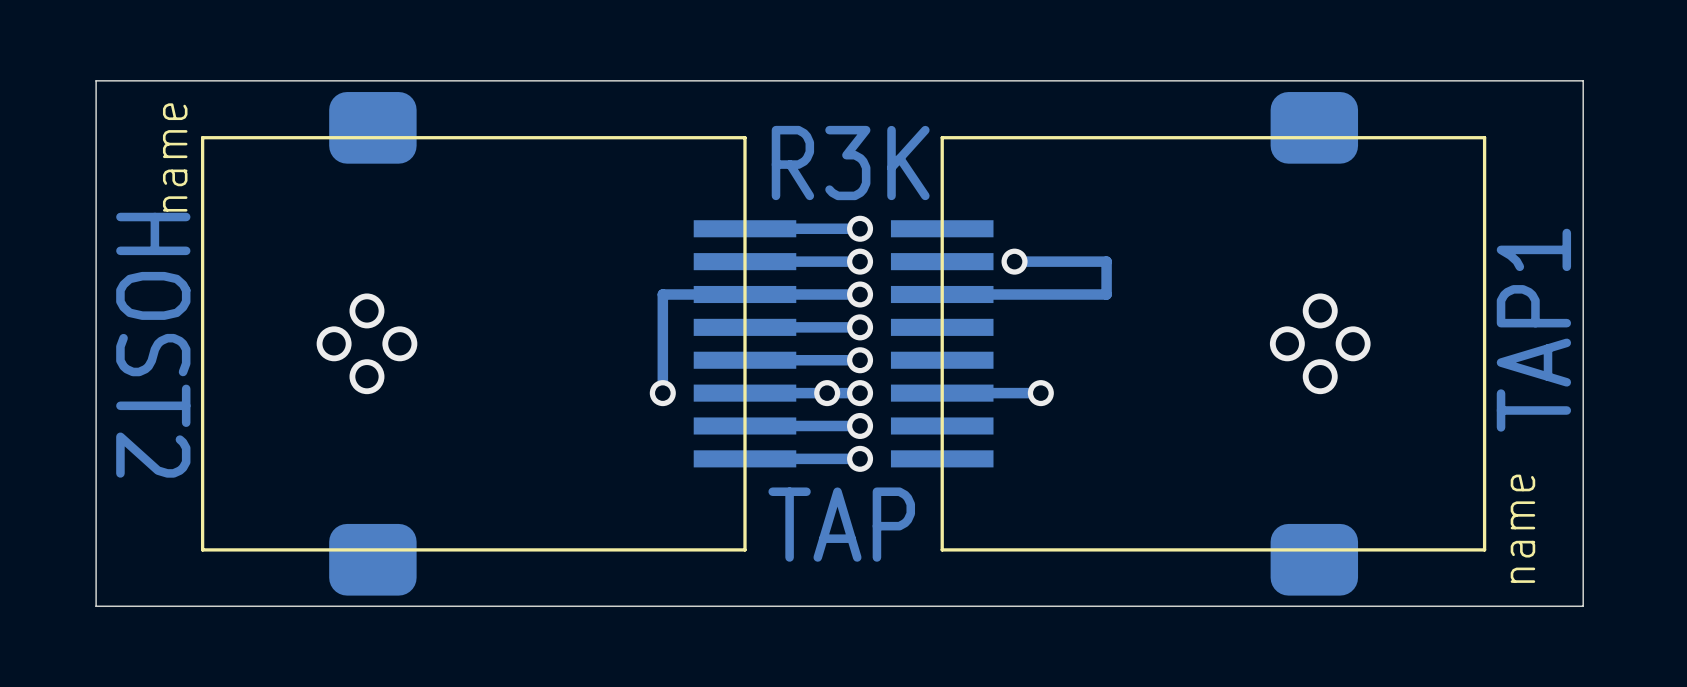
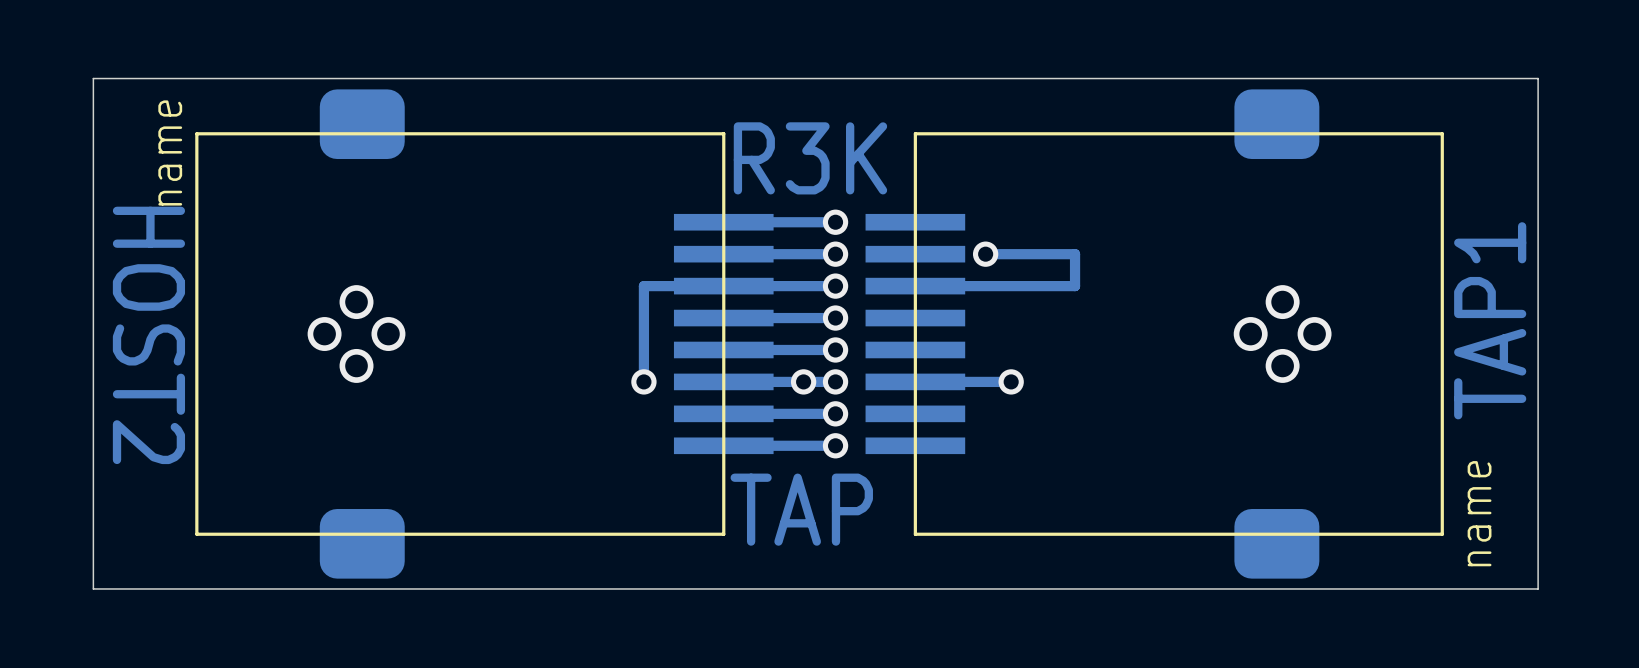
text position: R3K (850, 163) -> R3K (810, 158)
text position: TAP (841, 524) -> TAP (801, 509)

